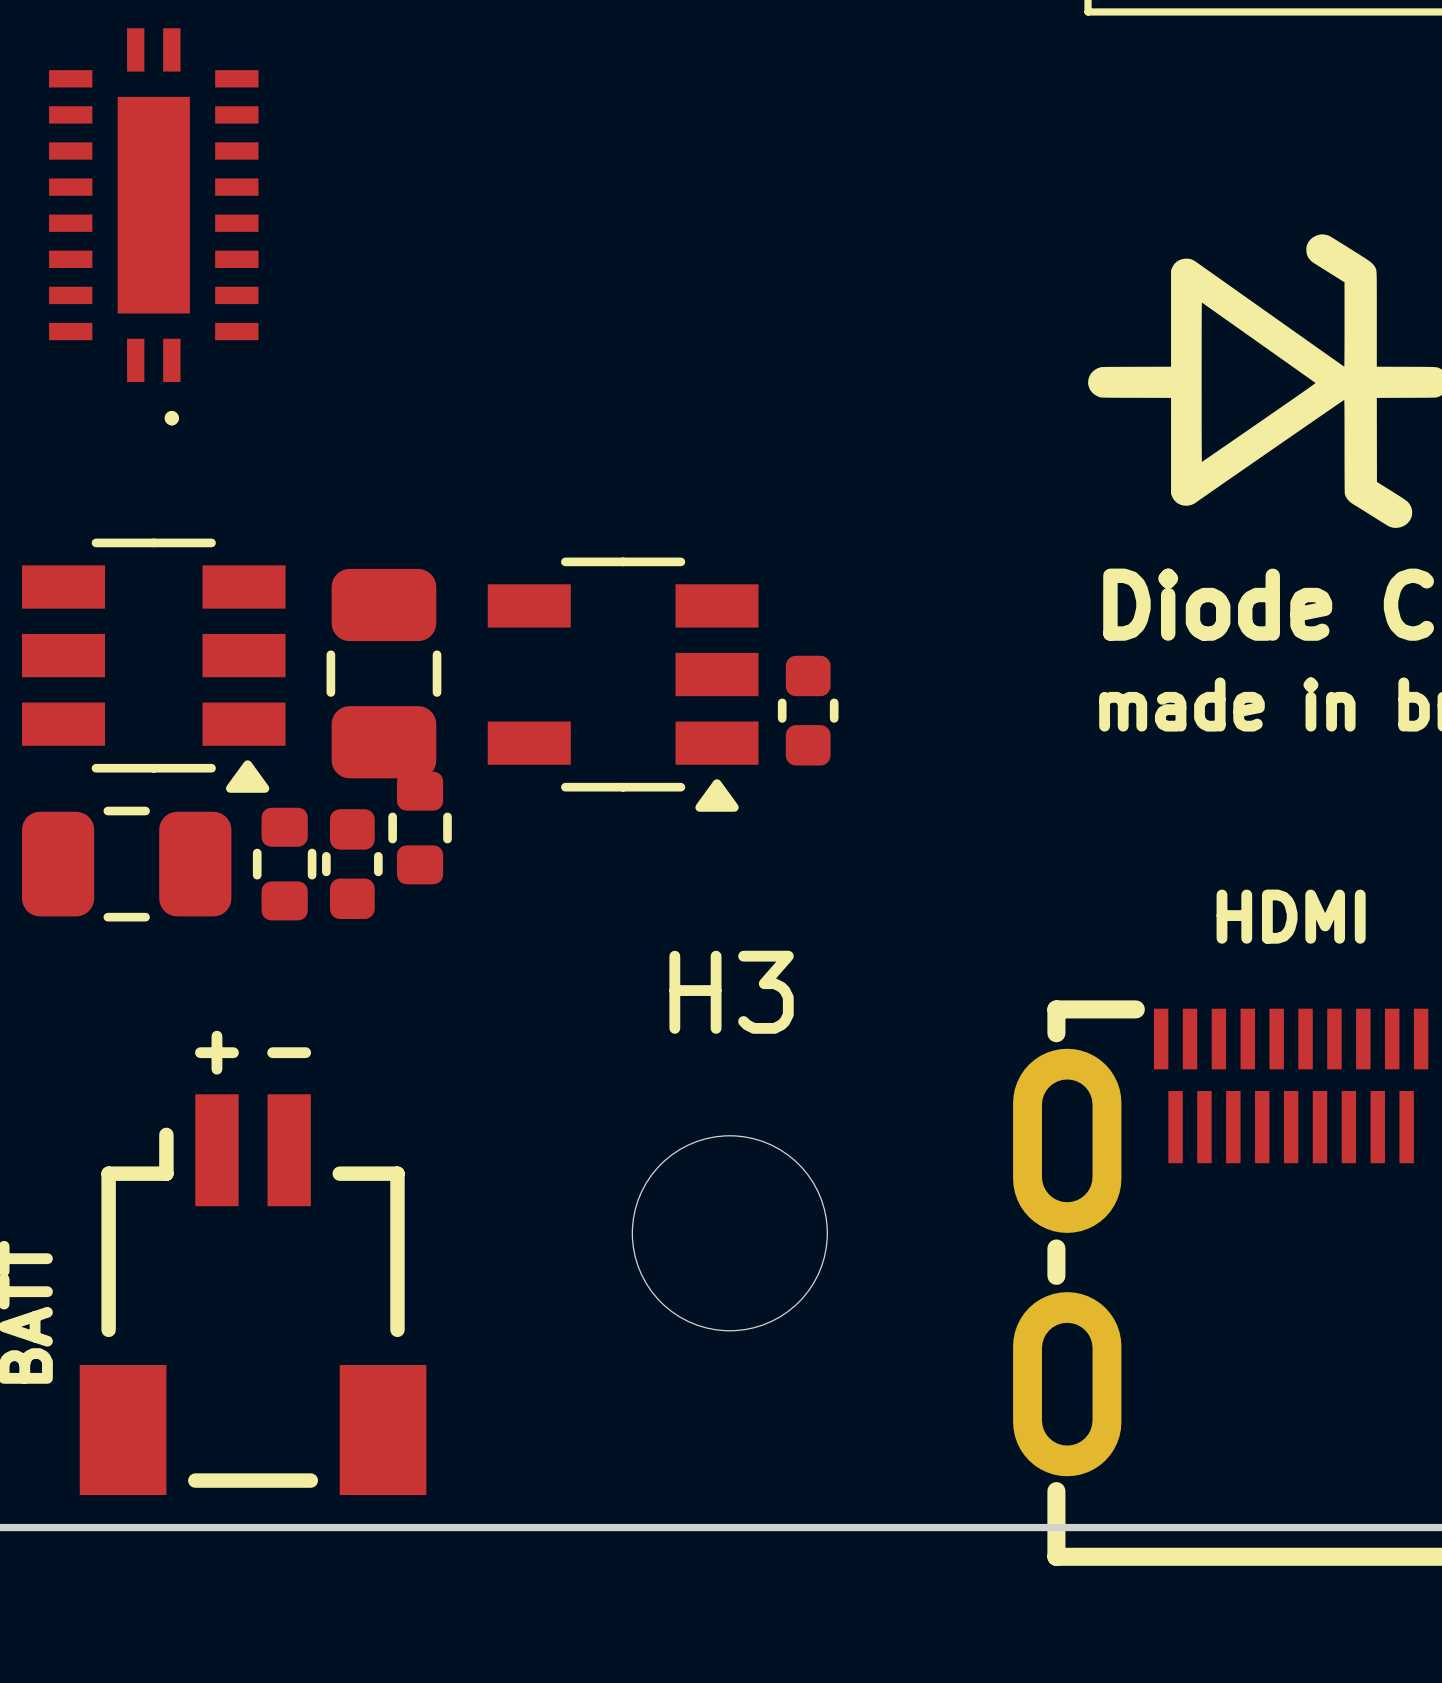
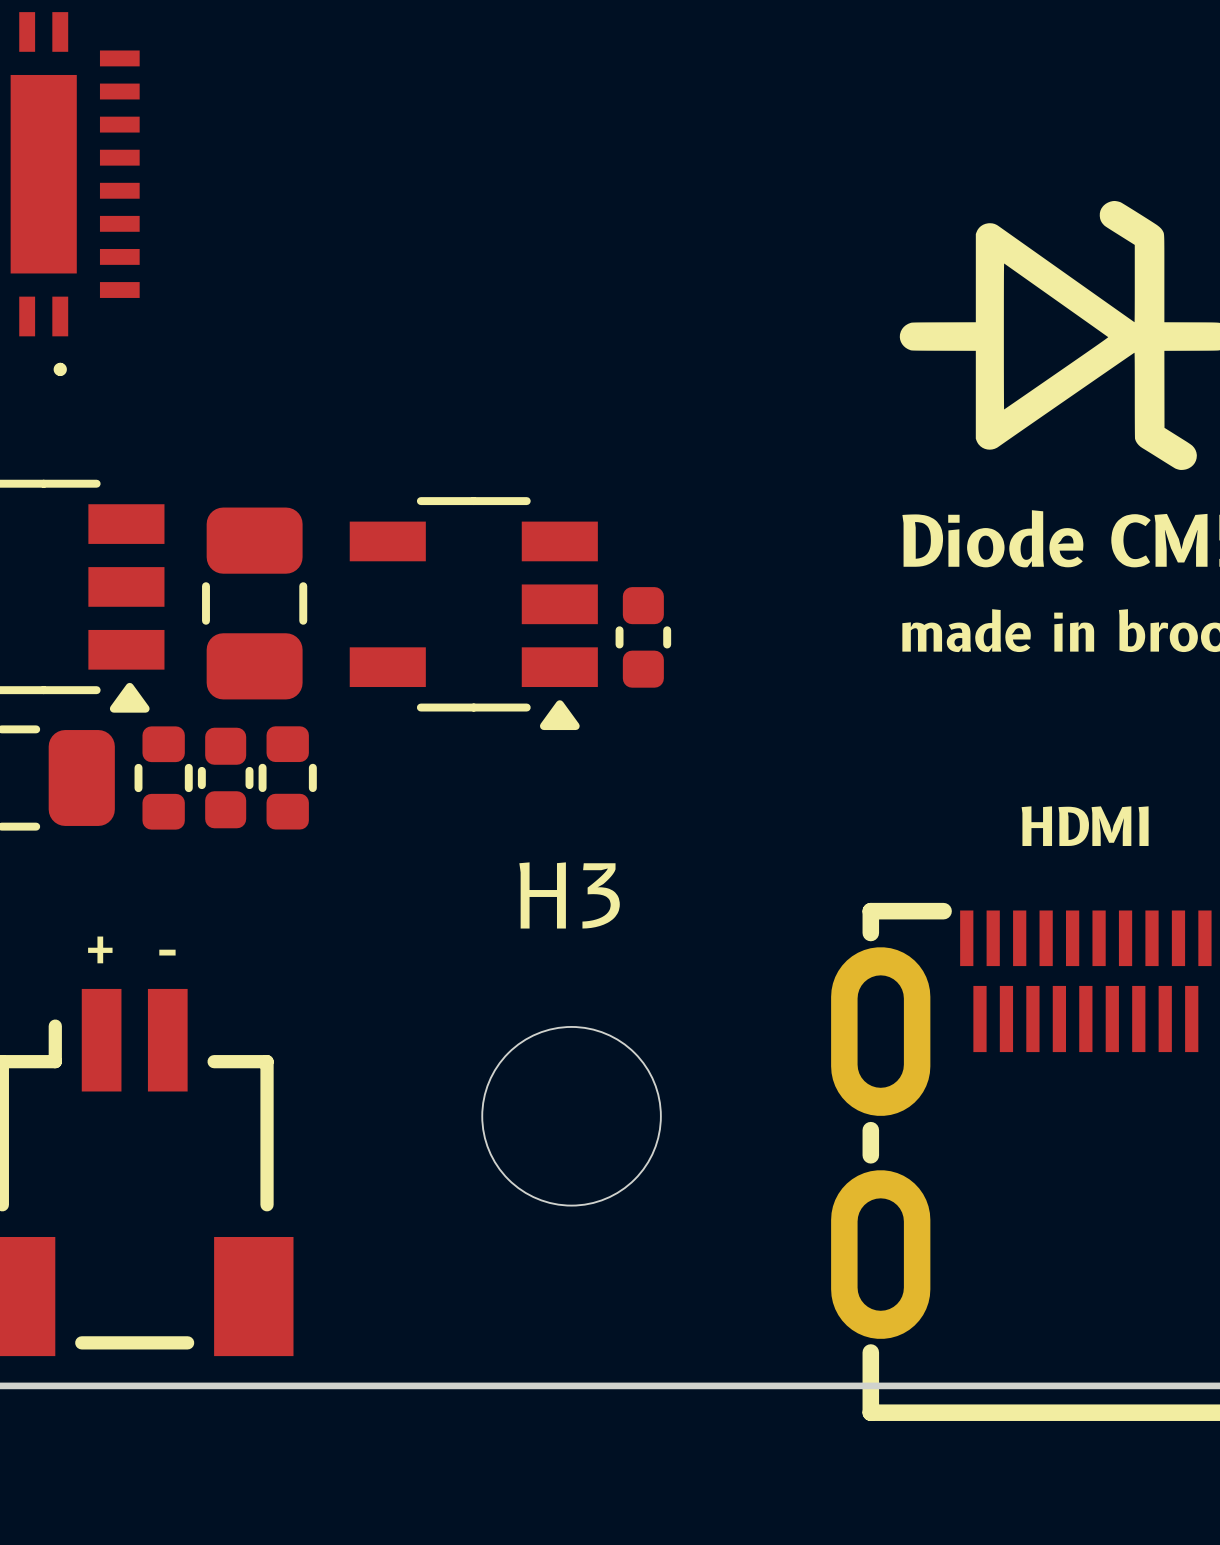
part position: (420, 827) -> (287, 777)

